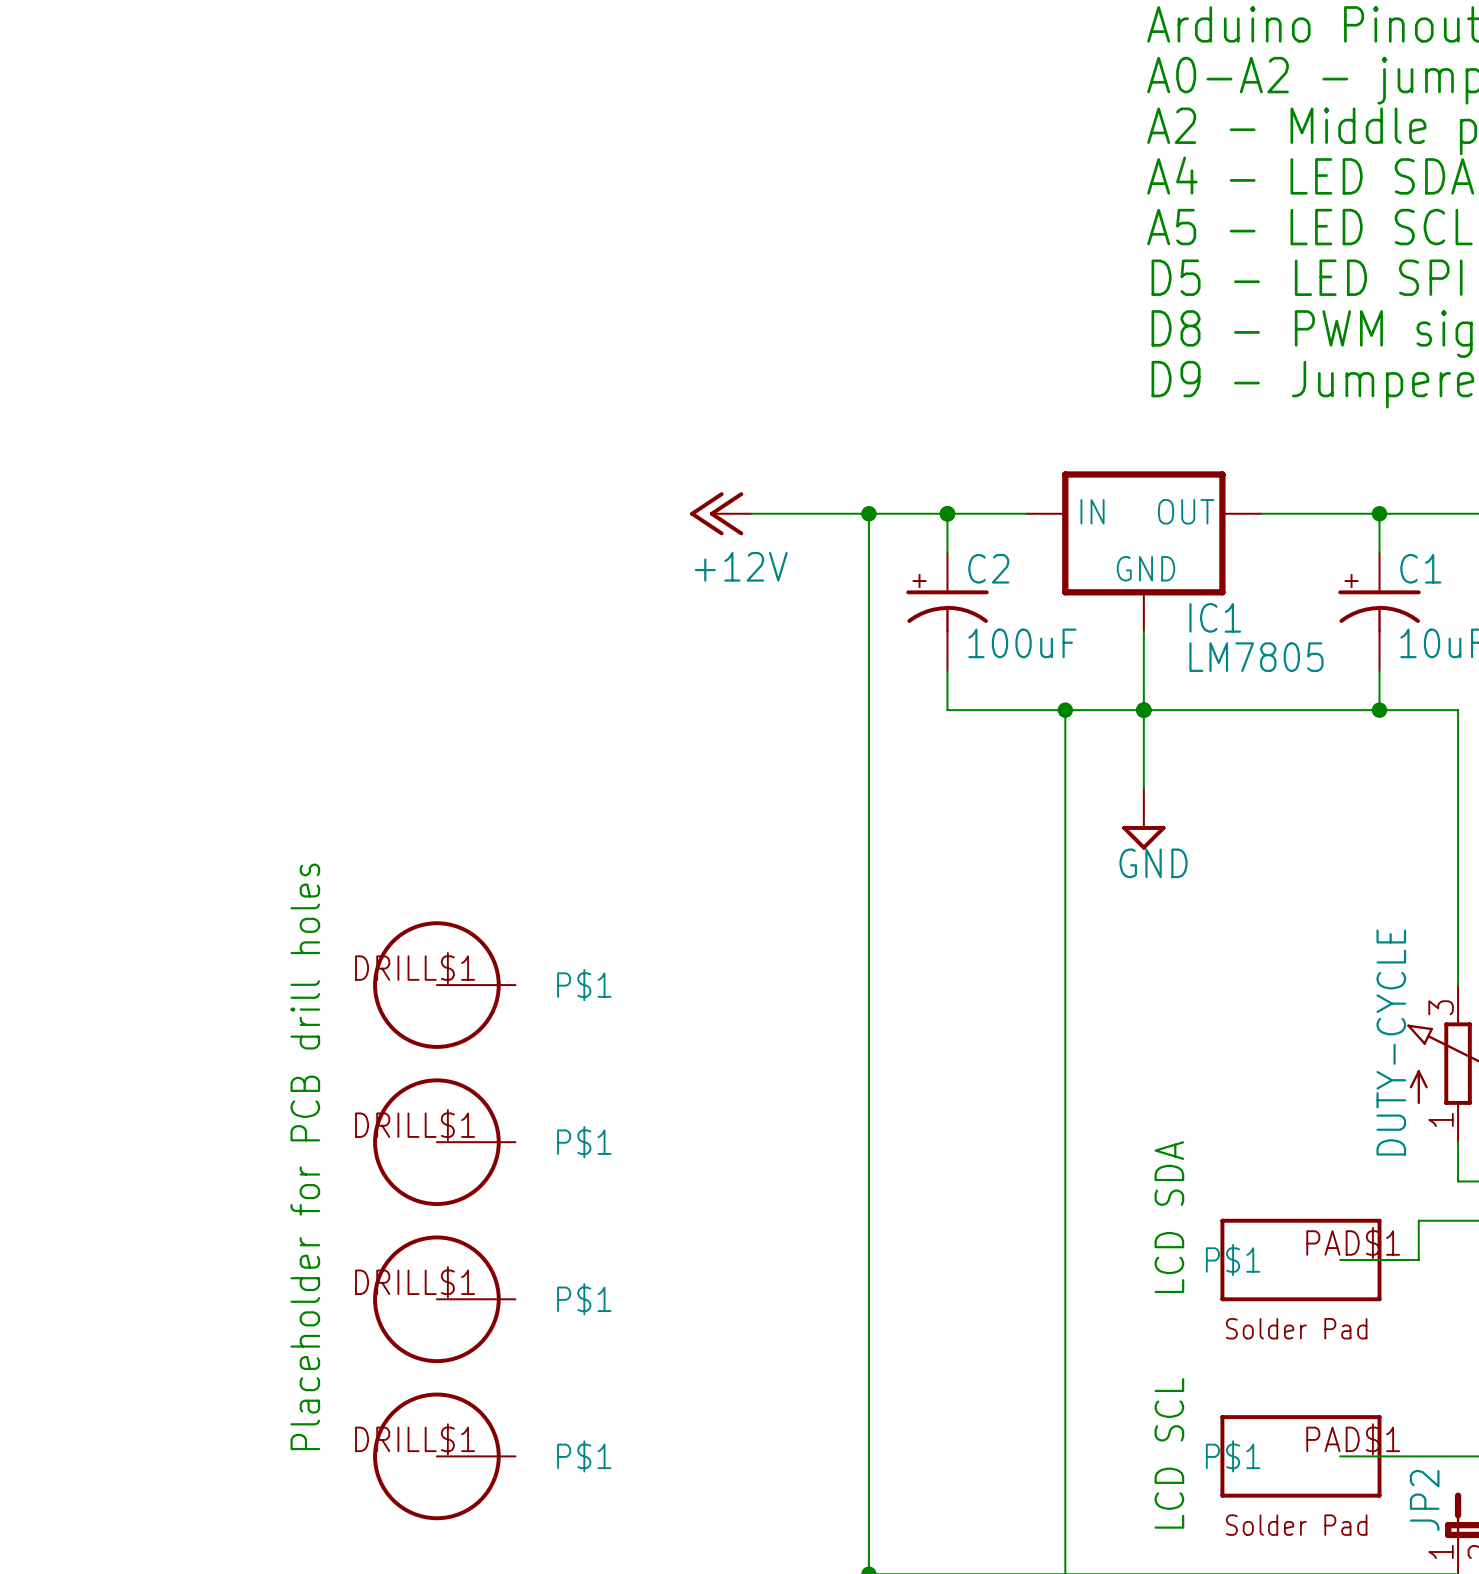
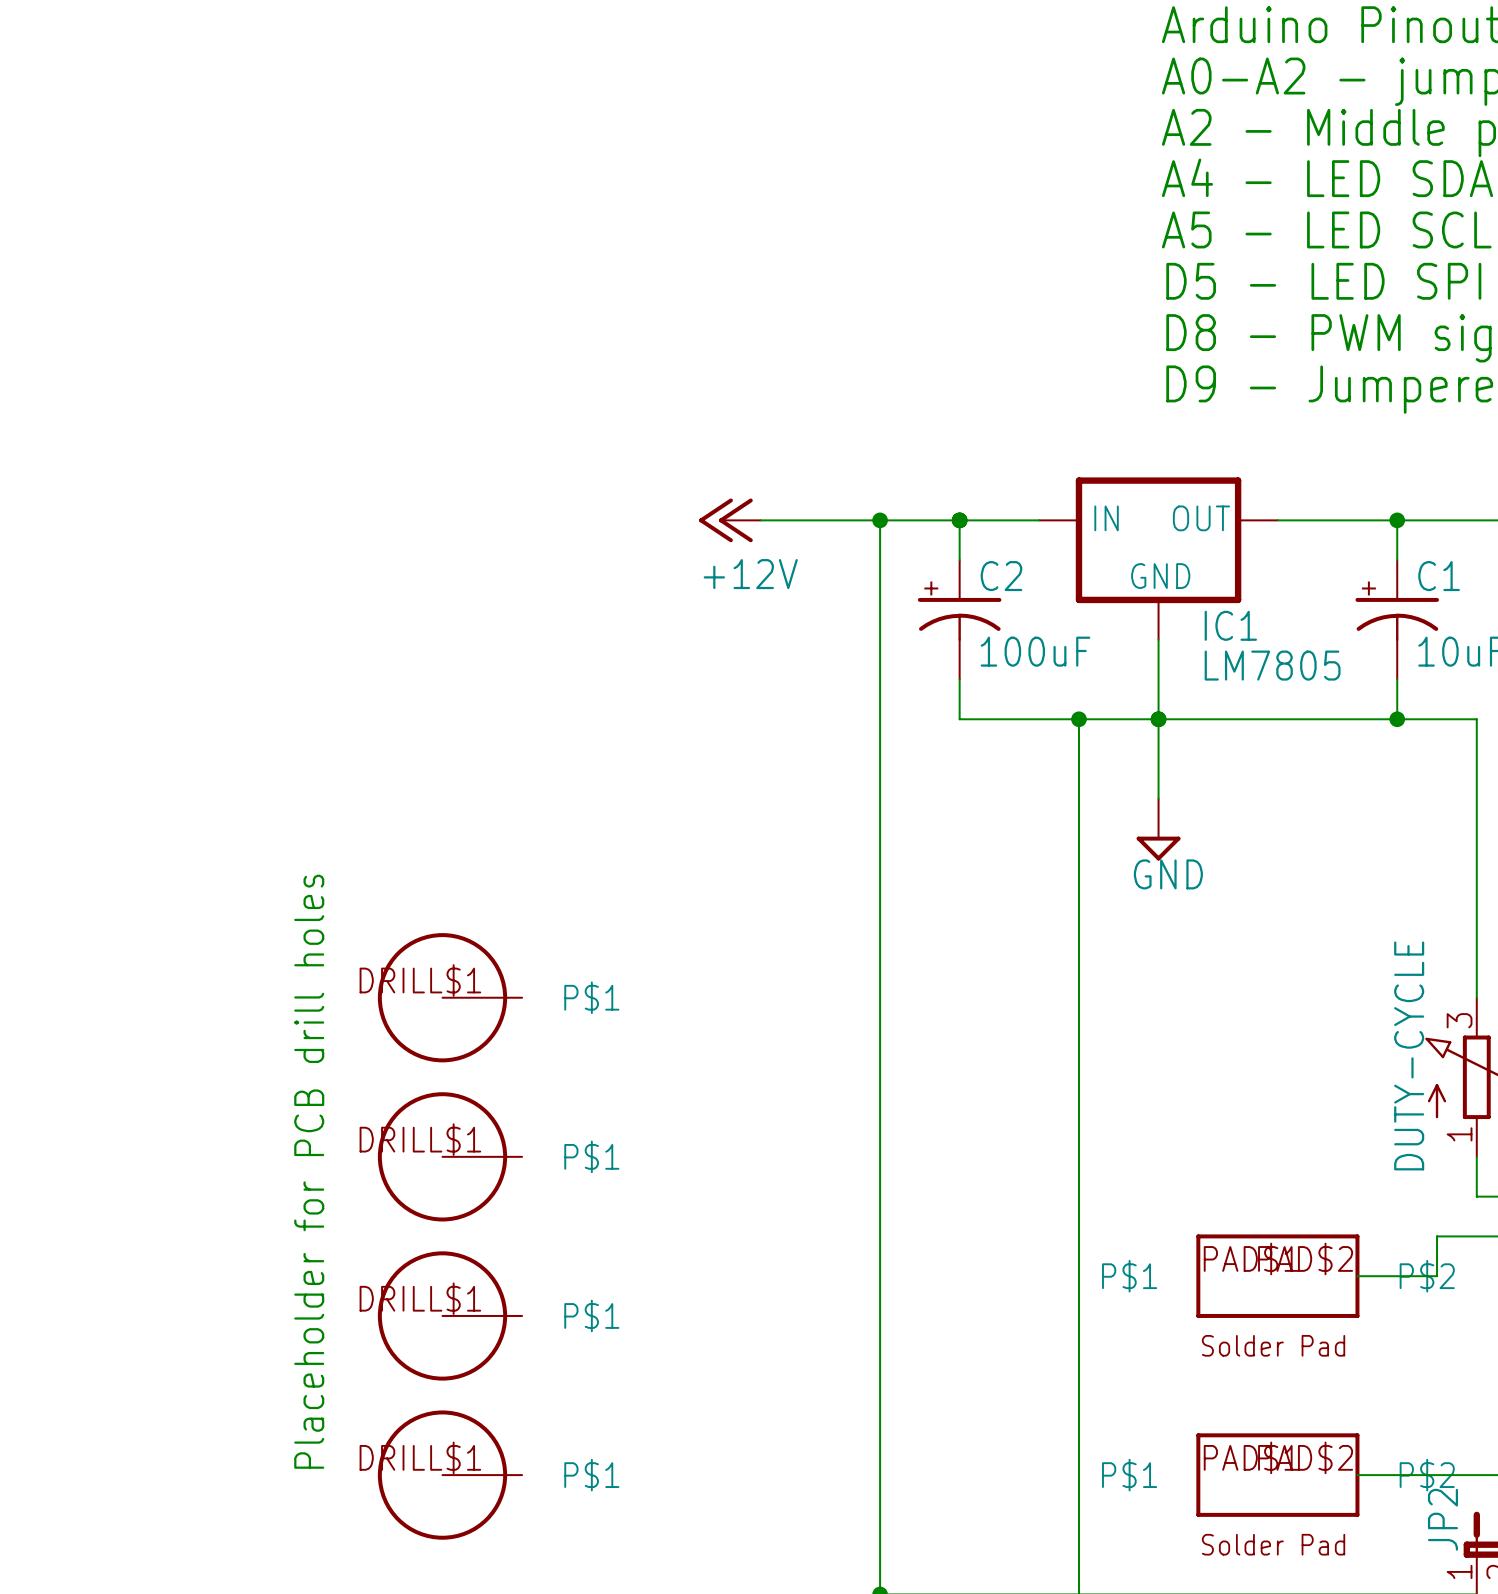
text: LCD SDA (1169, 1217) -> none
part: none -> (1277, 1276)
part: (1300, 1260) -> none
text: LCD SCL (1169, 1453) -> none
part: none -> (1277, 1475)
part: (1300, 1456) -> none

